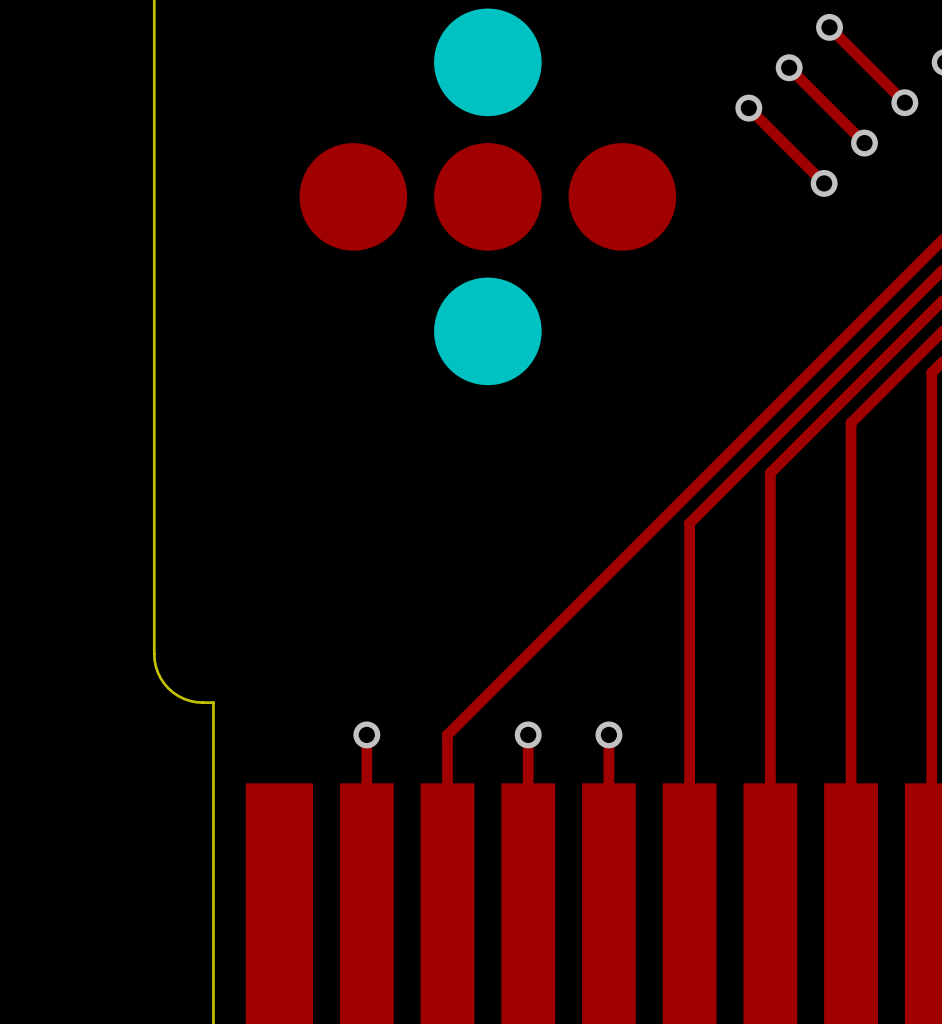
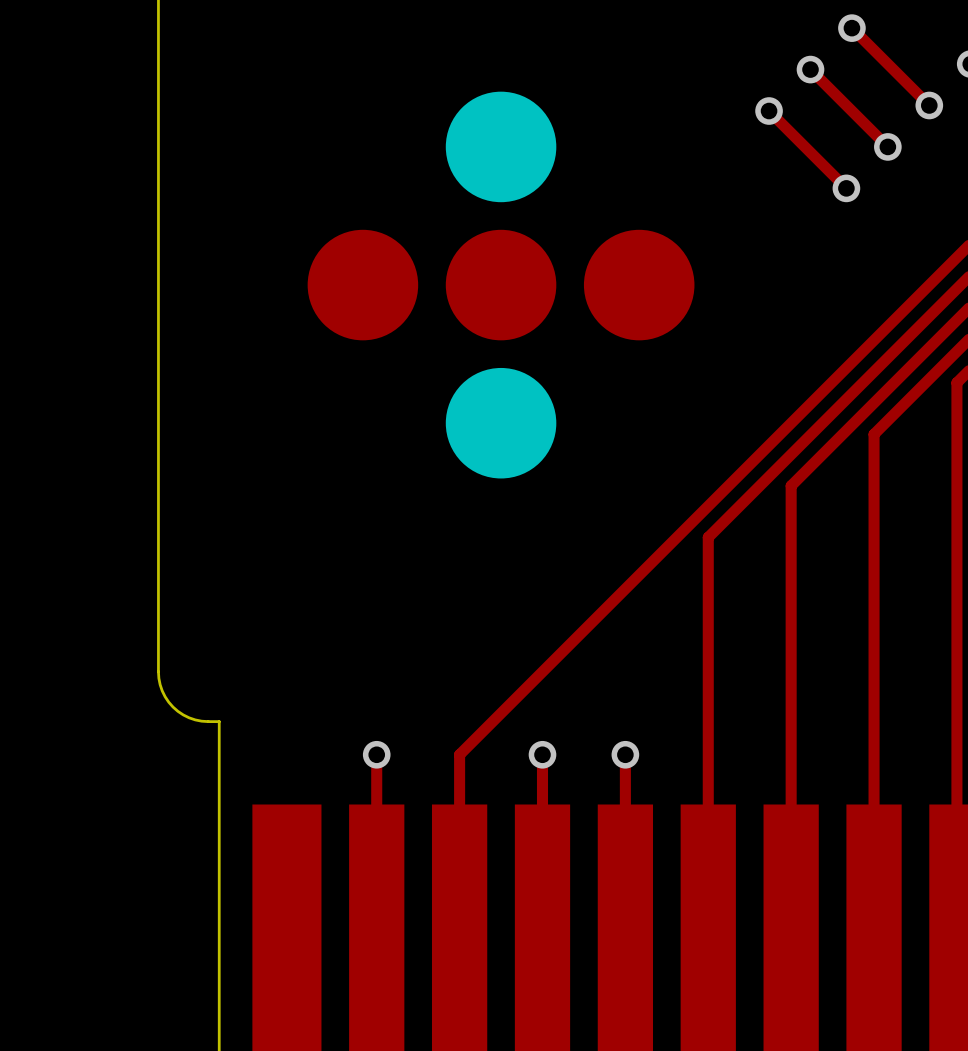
part position: (487, 196) -> (501, 285)

